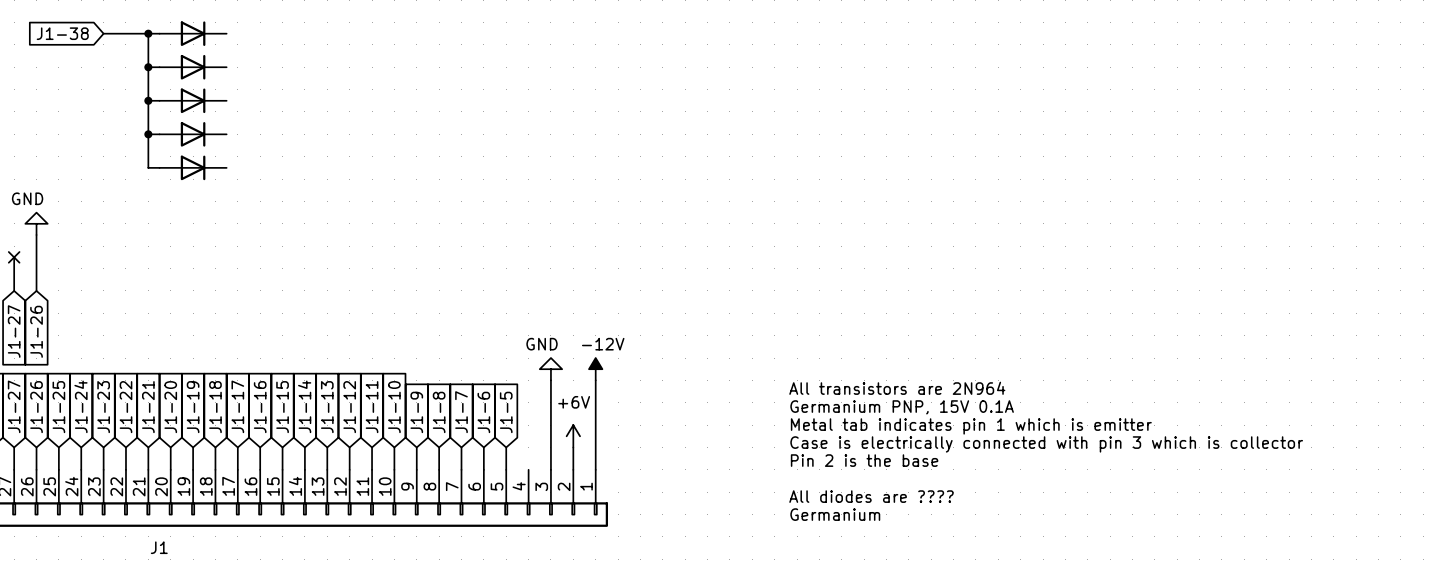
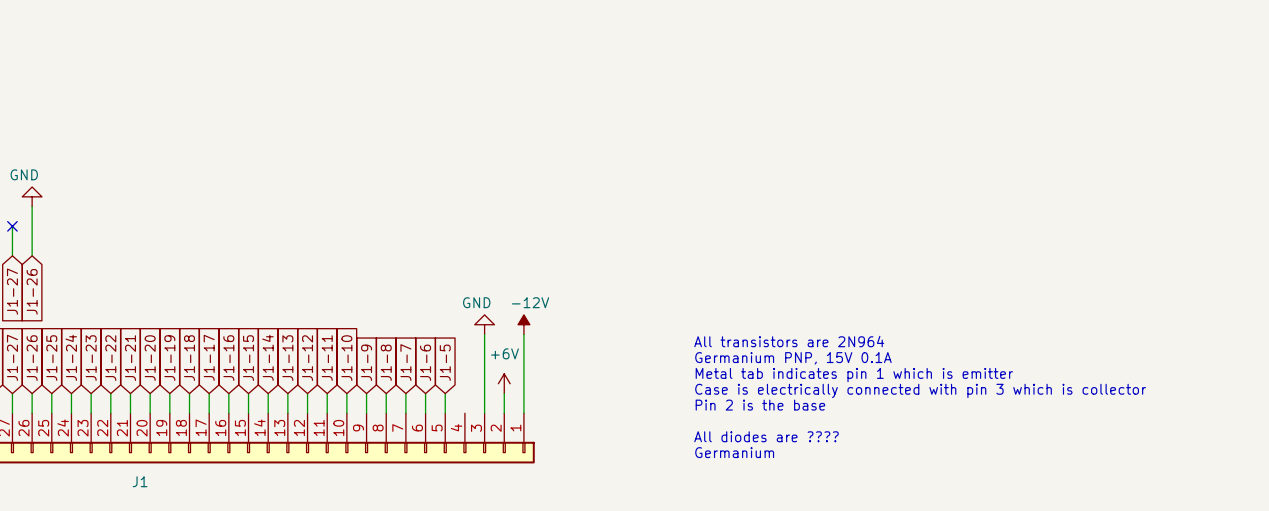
global label: J1-38 (62, 33) -> none
wire: (103, 33) (159, 33) -> none
wire: (148, 33) (148, 167) (159, 167) -> none
junction: (148, 33) -> none
part: (193, 33) -> none
wire: (148, 67) (159, 67) -> none
junction: (148, 67) -> none
part: (193, 67) -> none
wire: (148, 100) (159, 100) -> none
junction: (148, 100) -> none
part: (193, 100) -> none
wire: (148, 134) (159, 134) -> none
junction: (148, 134) -> none
part: (193, 134) -> none
part: (193, 167) -> none

